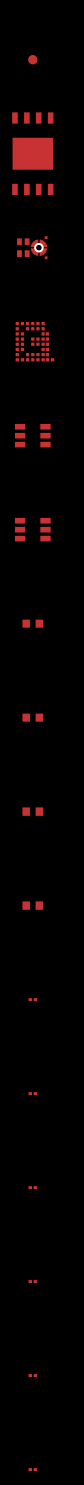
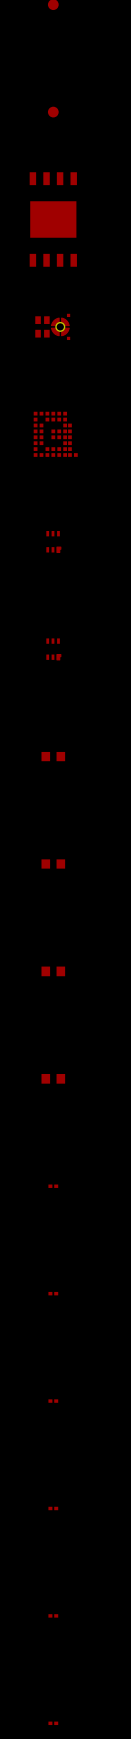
part footprint: [14, 423, 51, 448] -> [46, 531, 62, 554]
part footprint: [14, 517, 51, 542] -> [46, 638, 62, 661]

